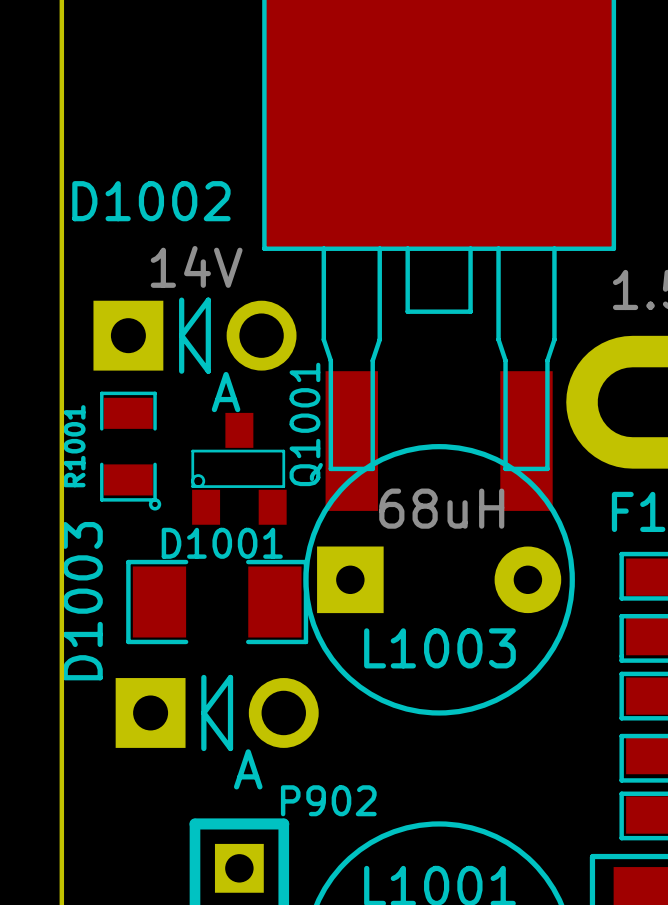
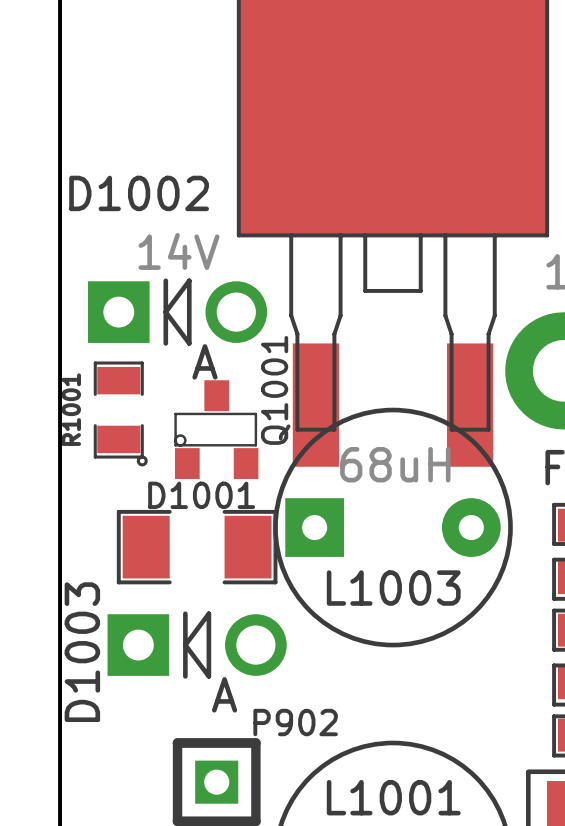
D1003 name position: D1003 (82, 601) -> D1003 (82, 652)

